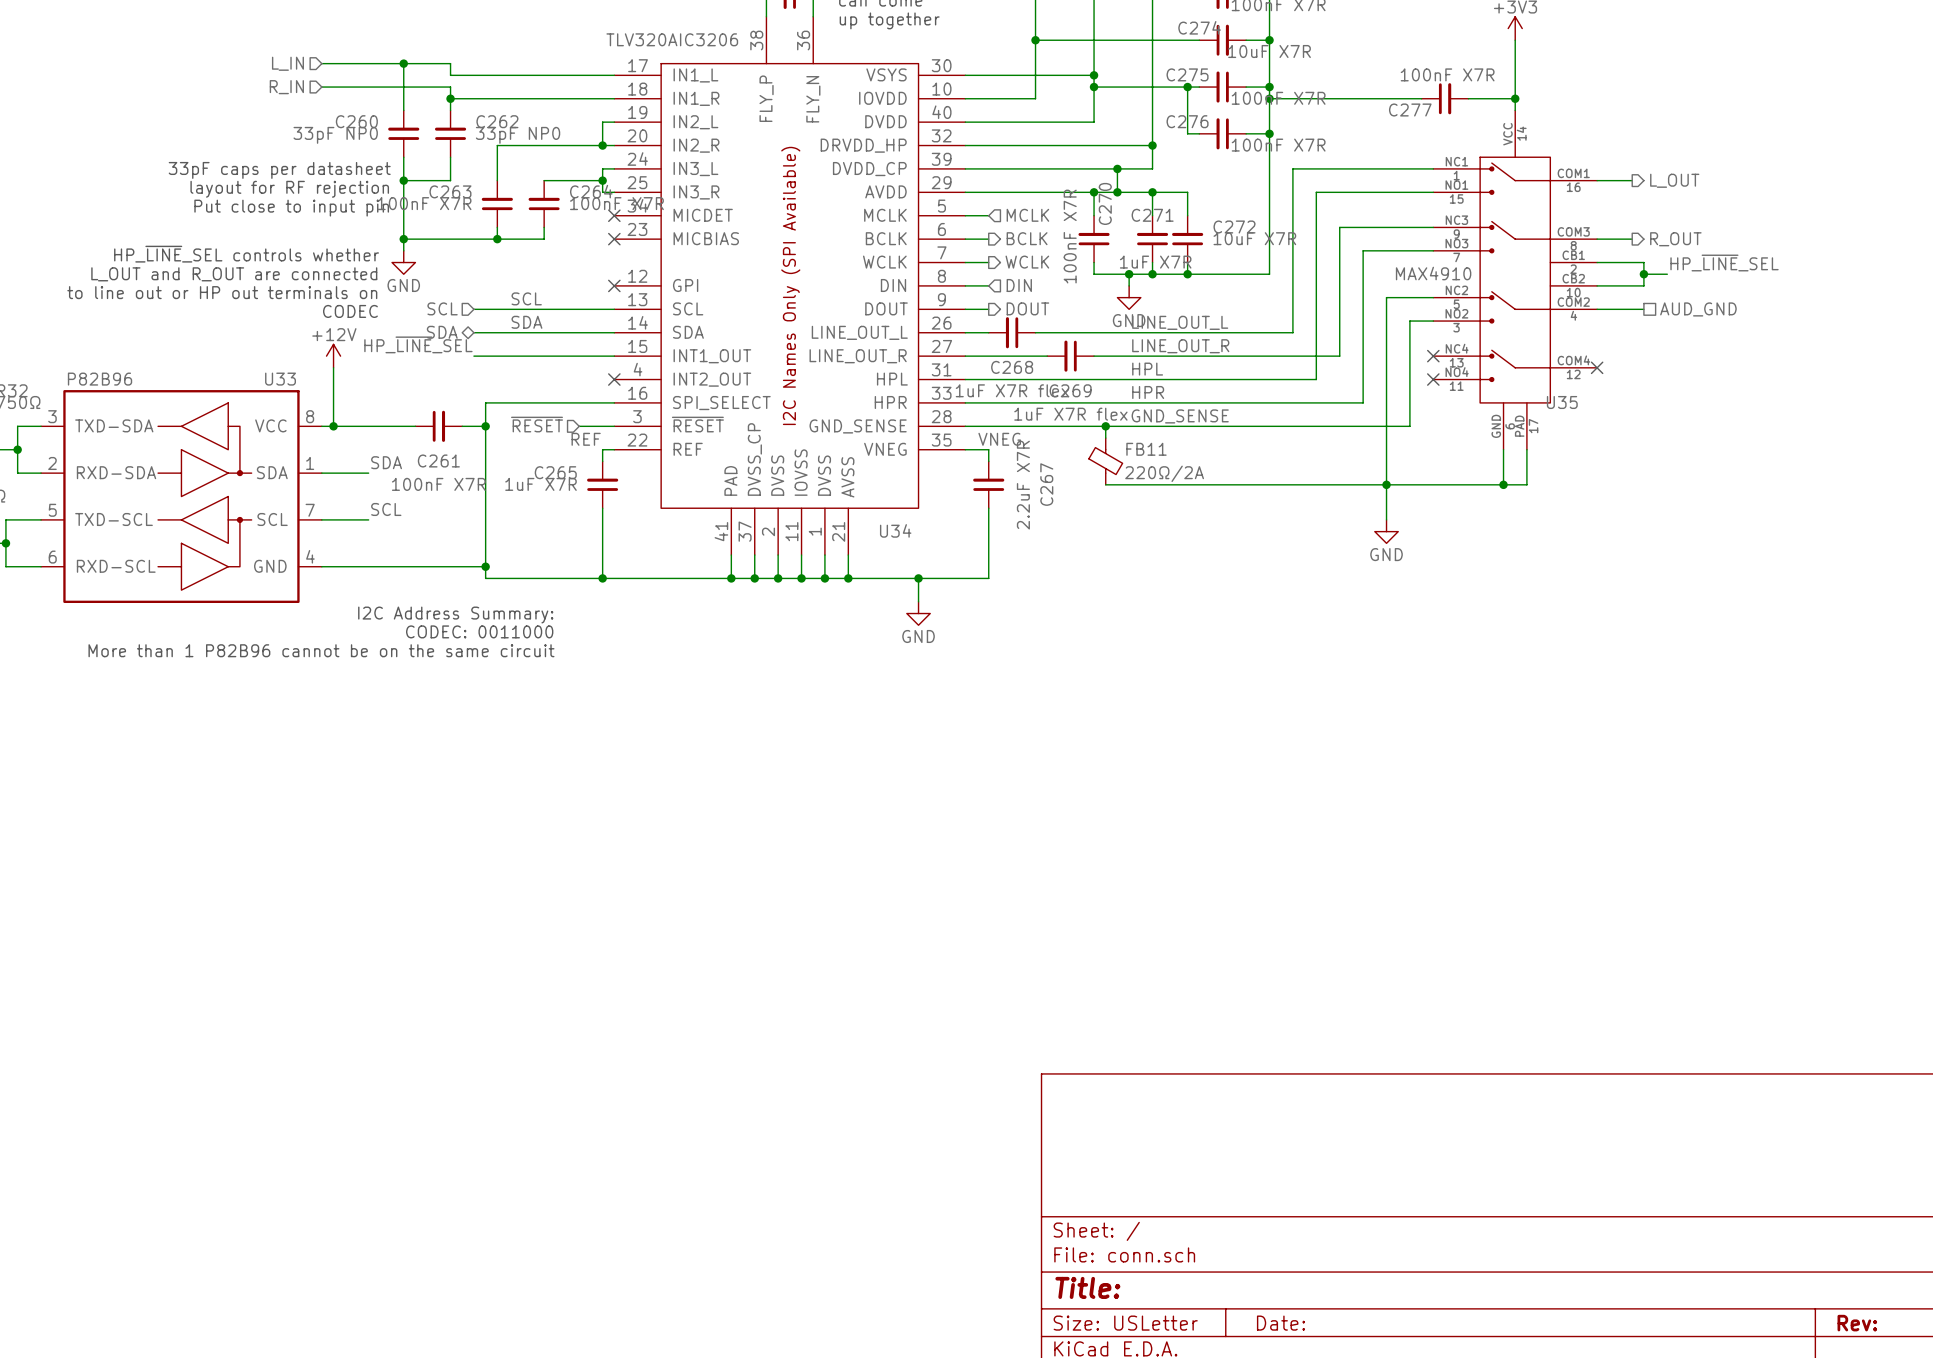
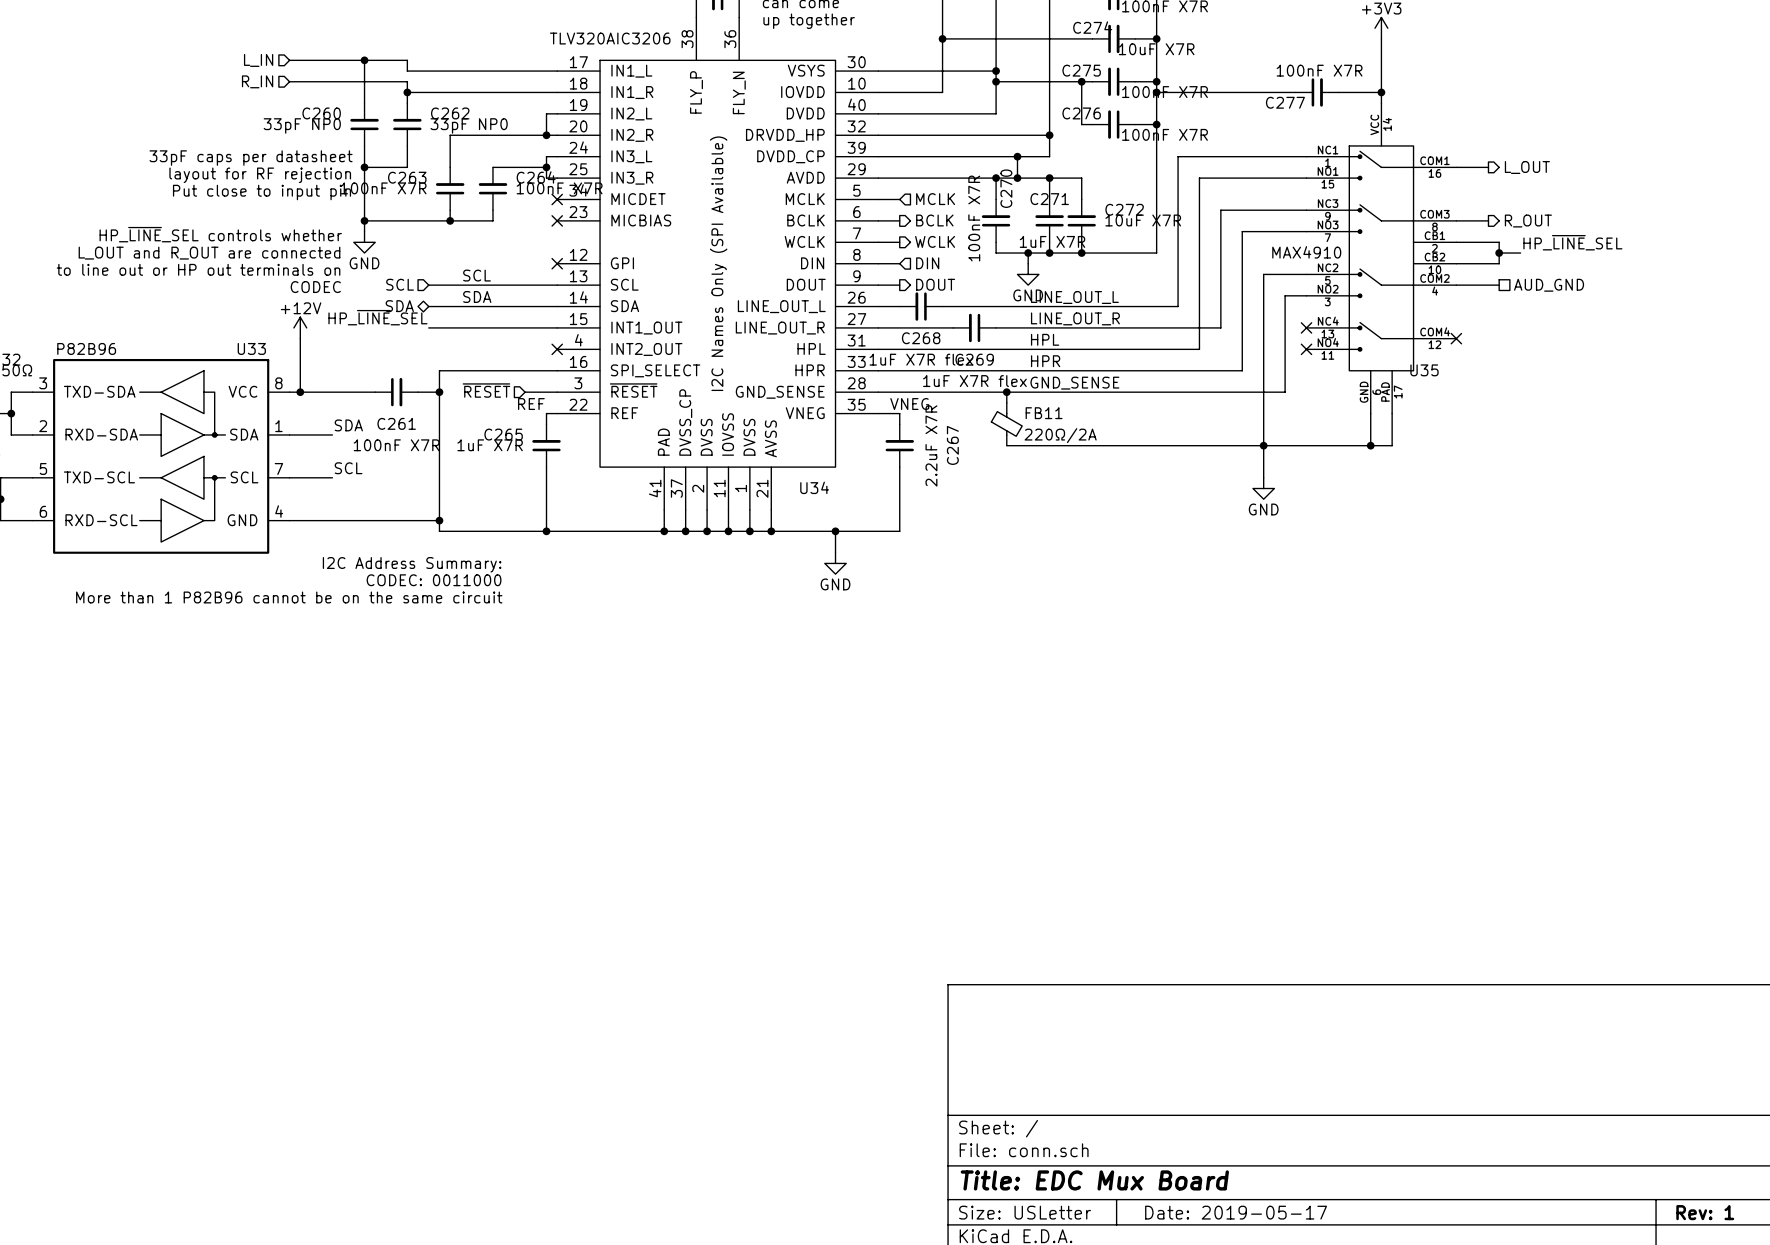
title block: Title: (1087, 1287) -> Title: EDC Mux Board (1094, 1180)
title block: Date: (1280, 1323) -> Date: 2019-05-17 (1236, 1212)
title block: Rev: (1857, 1323) -> Rev: 1 (1705, 1212)

